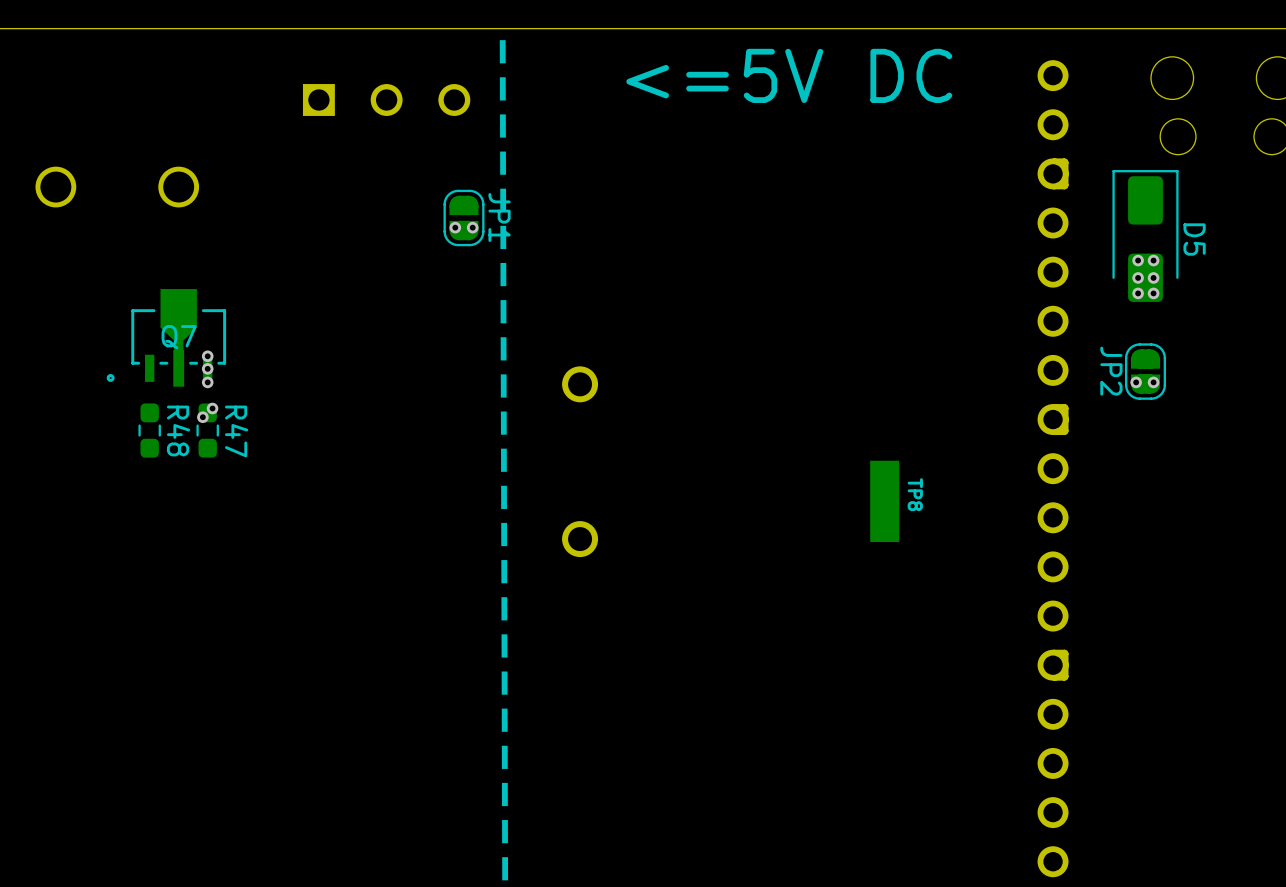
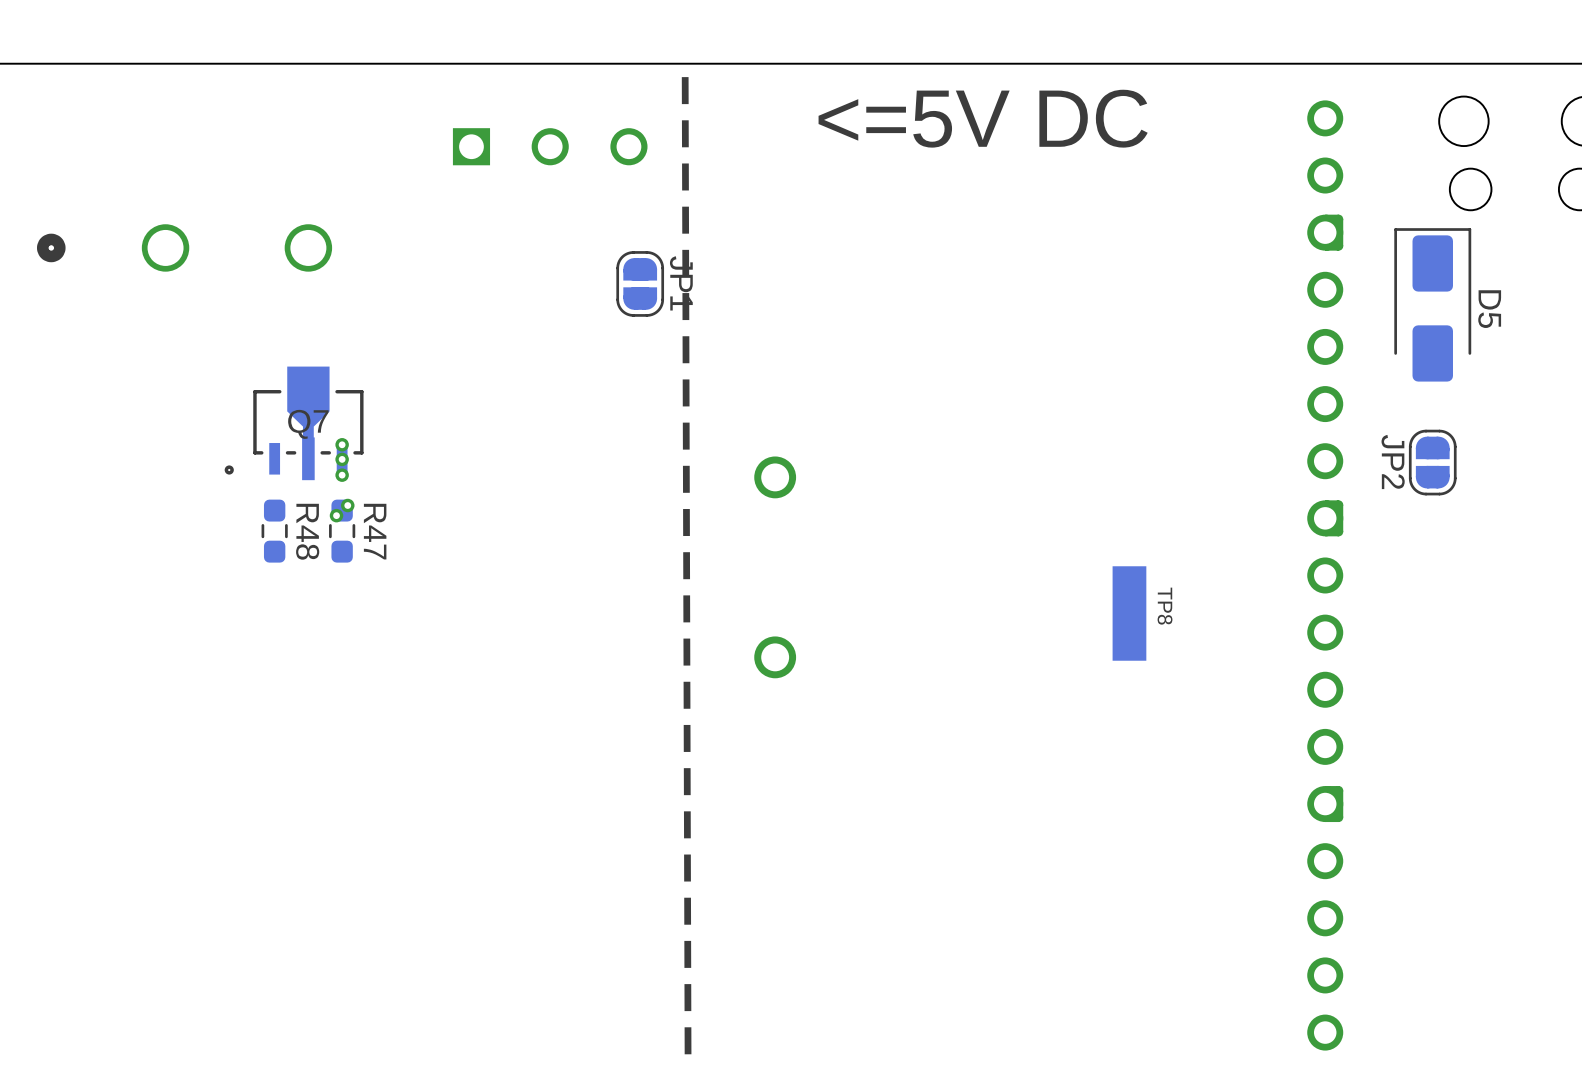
via: (455, 227) -> none
via: (472, 227) -> none
via: (1138, 260) -> none
via: (1153, 260) -> none
via: (1138, 277) -> none
via: (1153, 277) -> none
via: (1138, 293) -> none
via: (1153, 293) -> none
via: (1136, 382) -> none
via: (1153, 382) -> none

